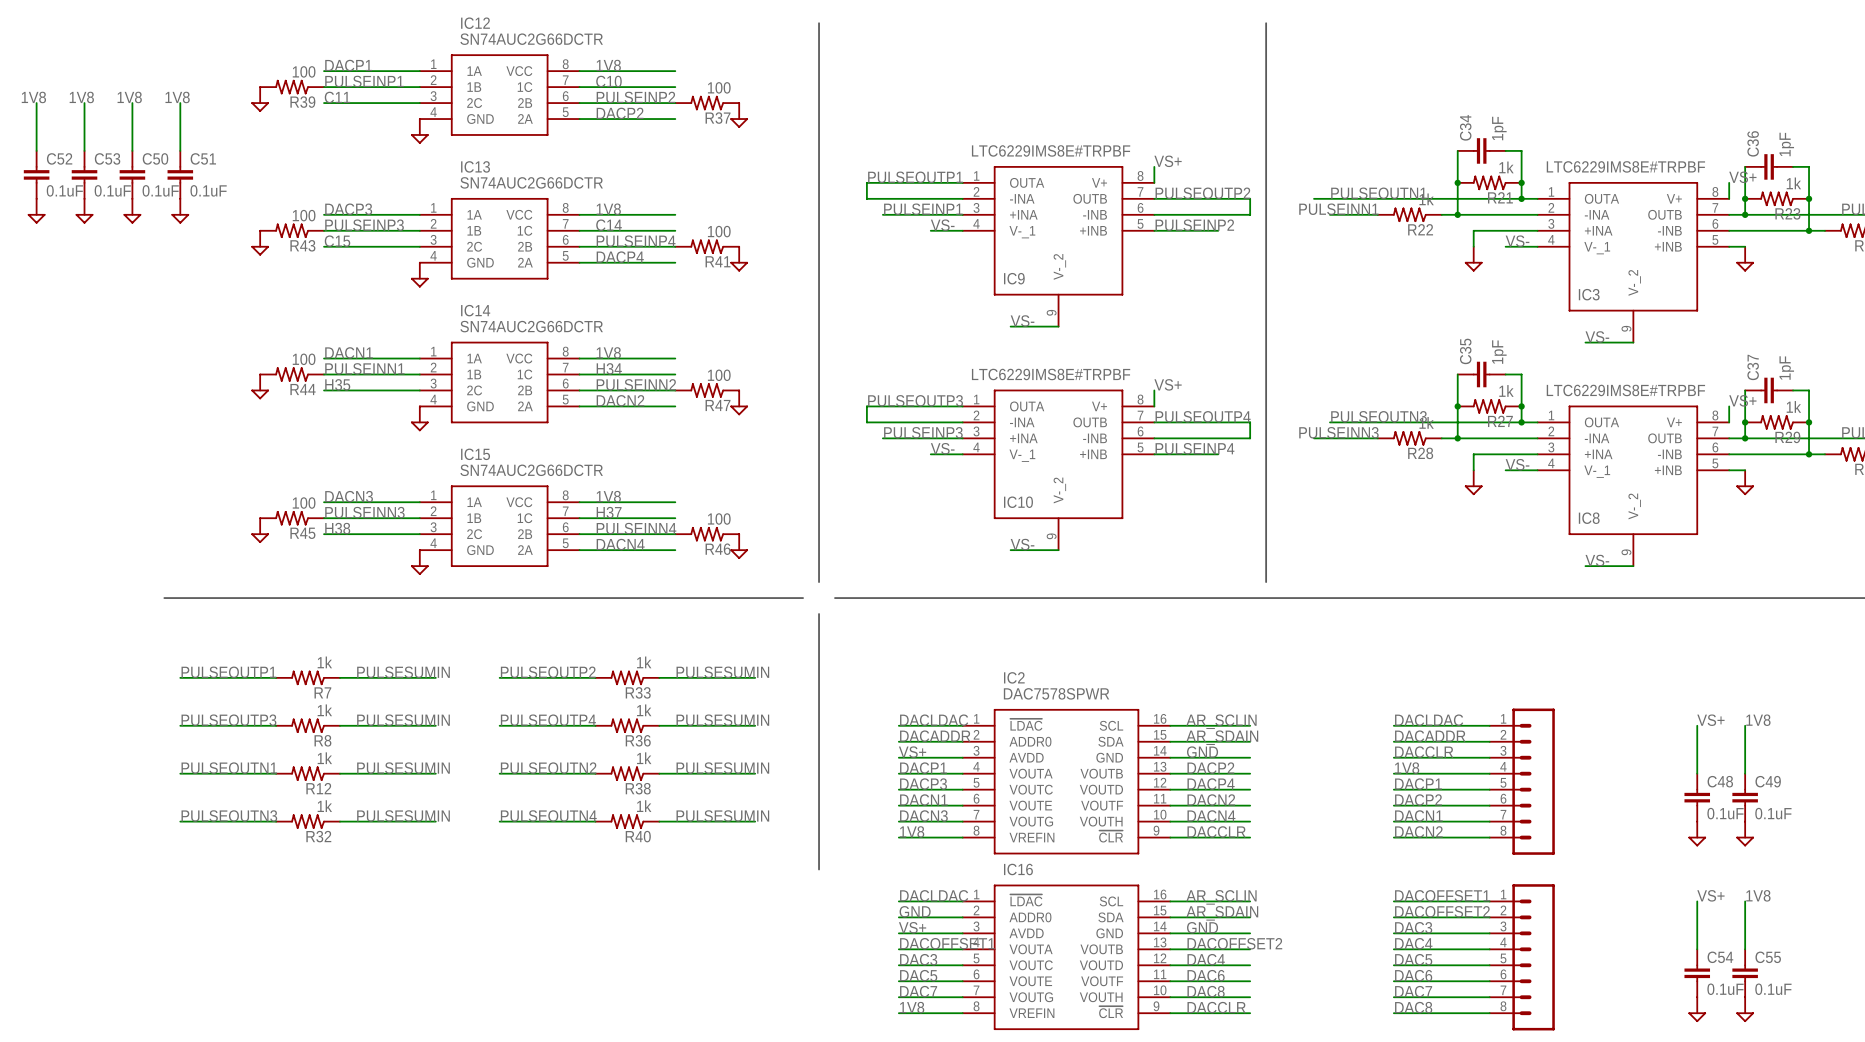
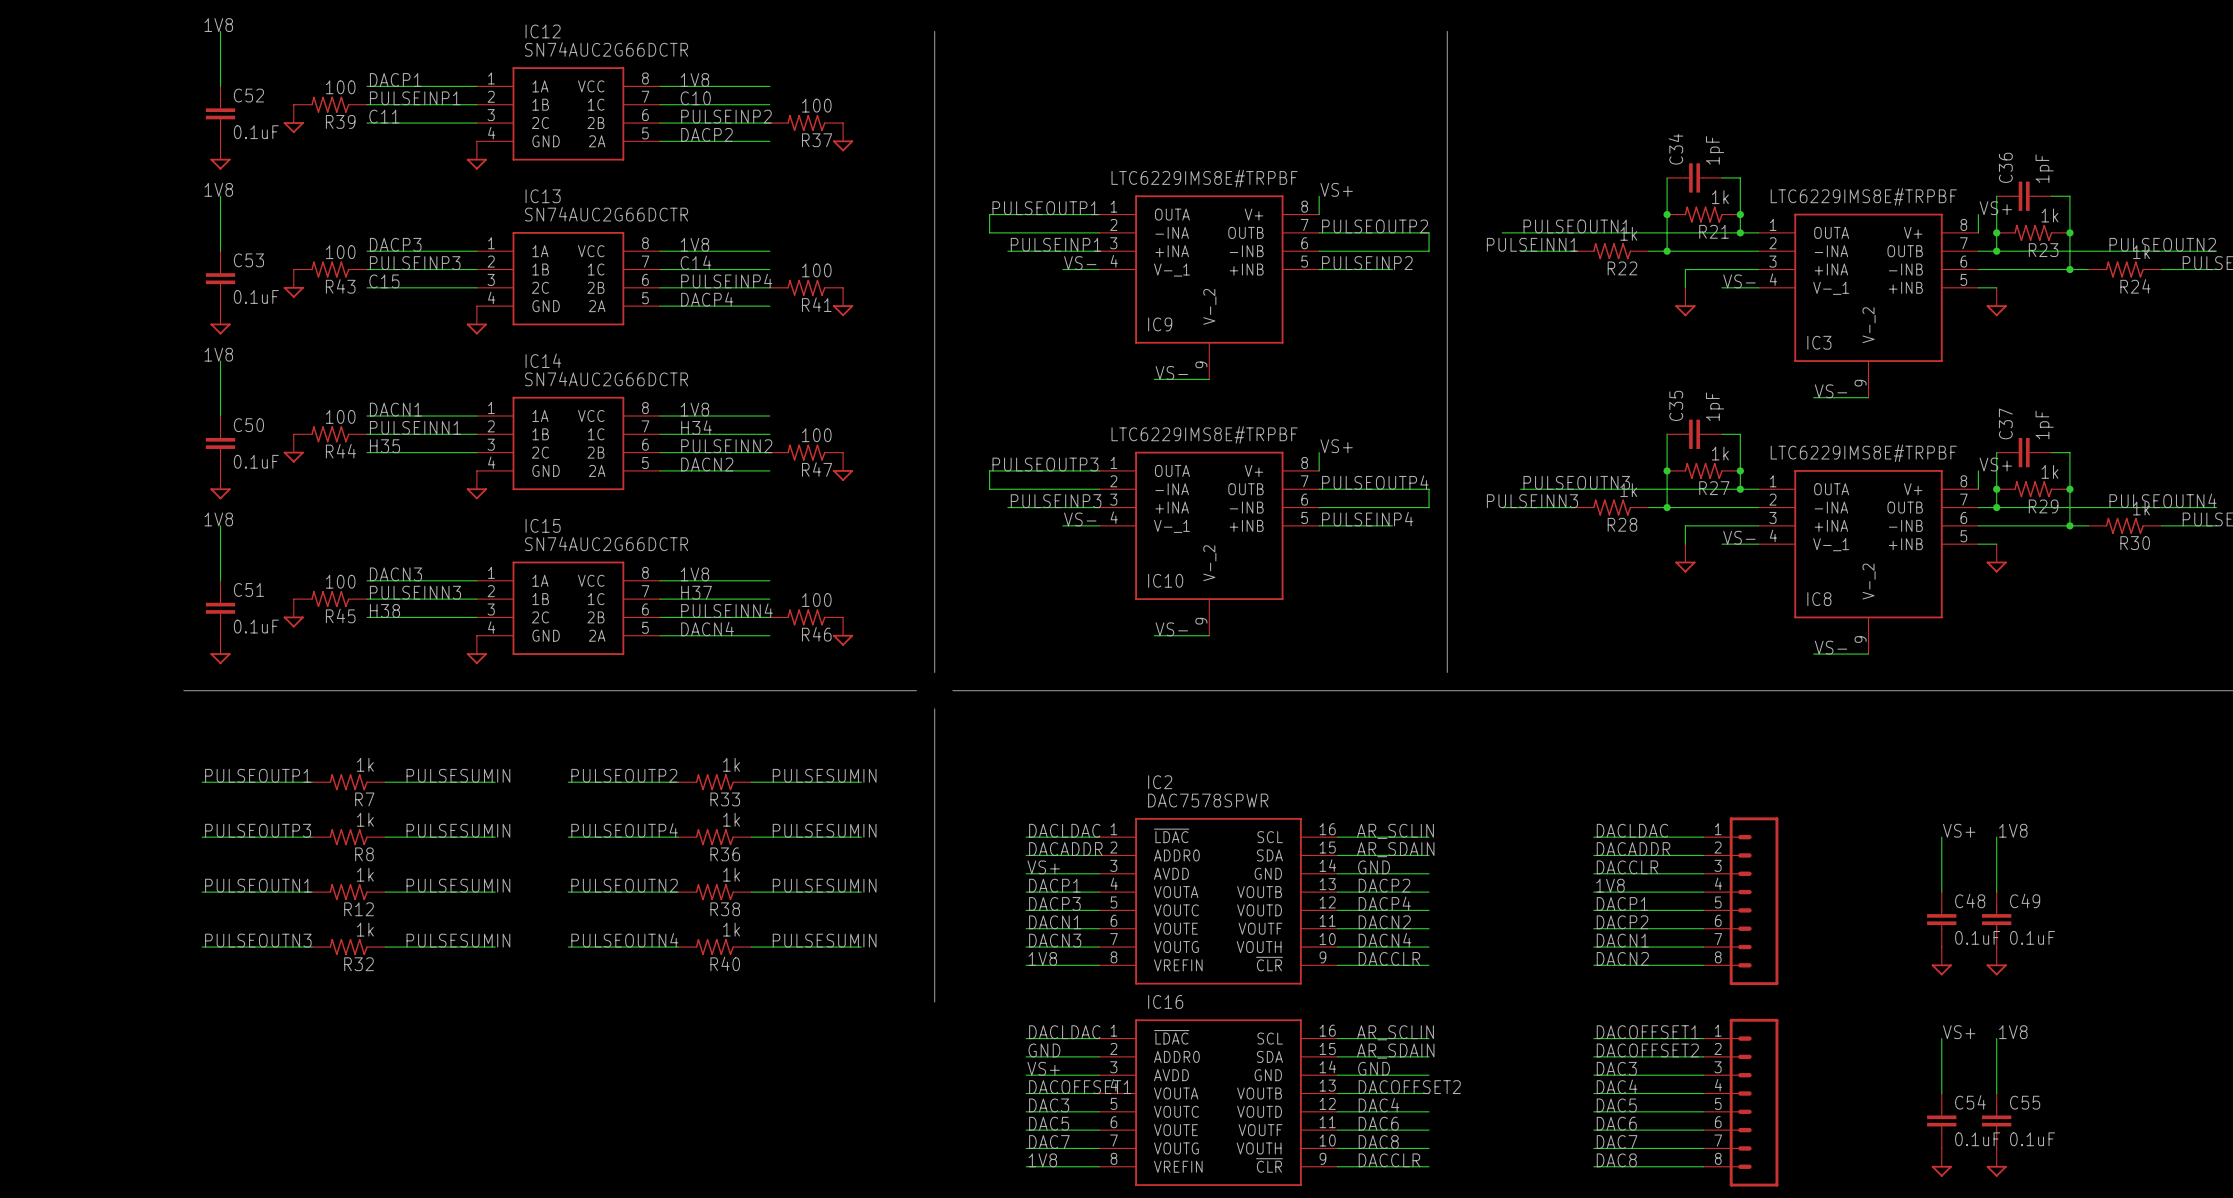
label: none -> 1V8 (218, 25)
label: 1V8 (33, 97) -> none
label: 1V8 (81, 97) -> none
label: 1V8 (129, 97) -> none
label: 1V8 (177, 97) -> none
wire: (36, 103) (36, 150) -> none
wire: (84, 103) (84, 150) -> none
wire: (132, 103) (132, 150) -> (220, 31) (220, 86)
wire: (180, 103) (180, 150) -> (220, 196) (220, 251)
power symbol: none -> (220, 155)
label: none -> 1V8 (218, 189)
C52 position: (36, 174) -> (220, 113)
C53 position: (84, 174) -> (220, 278)
C50 position: (132, 174) -> (220, 443)
C51 position: (180, 174) -> (220, 608)
power symbol: (36, 211) -> none
power symbol: (84, 211) -> none
power symbol: (132, 211) -> none
power symbol: (180, 211) -> none
power symbol: none -> (220, 320)
label: none -> 1V8 (218, 354)
wire: none -> (220, 361) (220, 416)
power symbol: none -> (220, 485)
label: none -> 1V8 (218, 519)
wire: none -> (220, 525) (220, 580)
power symbol: none -> (220, 649)

